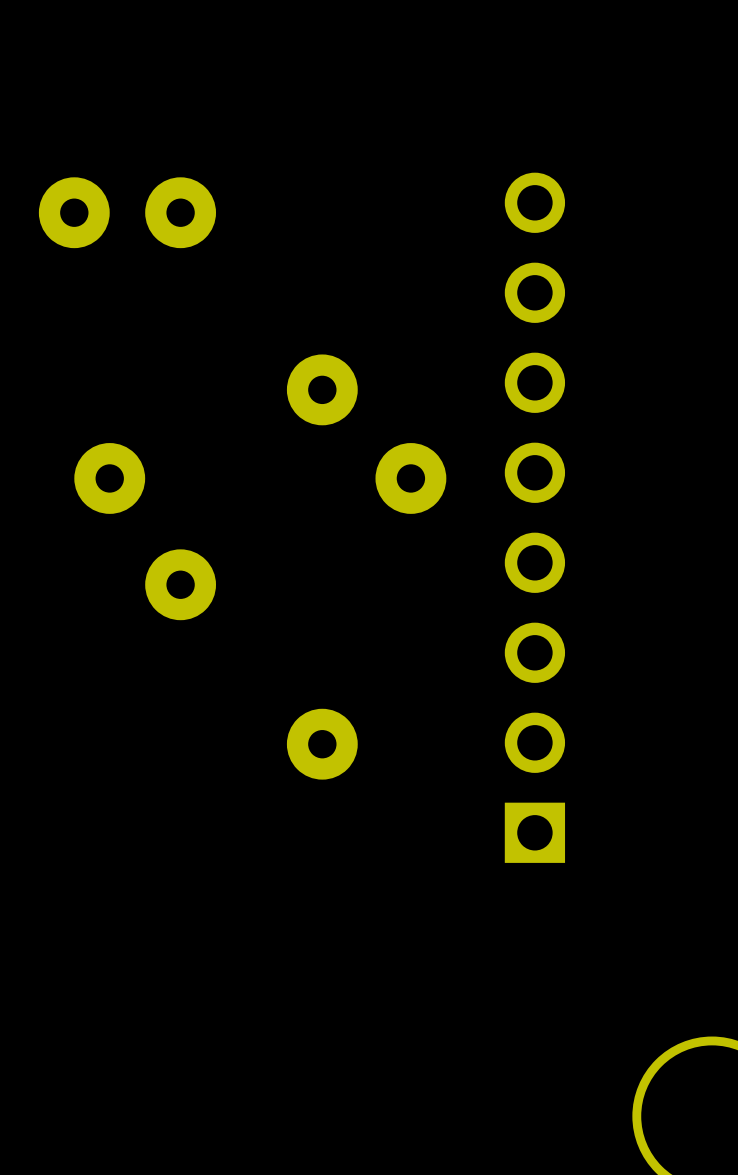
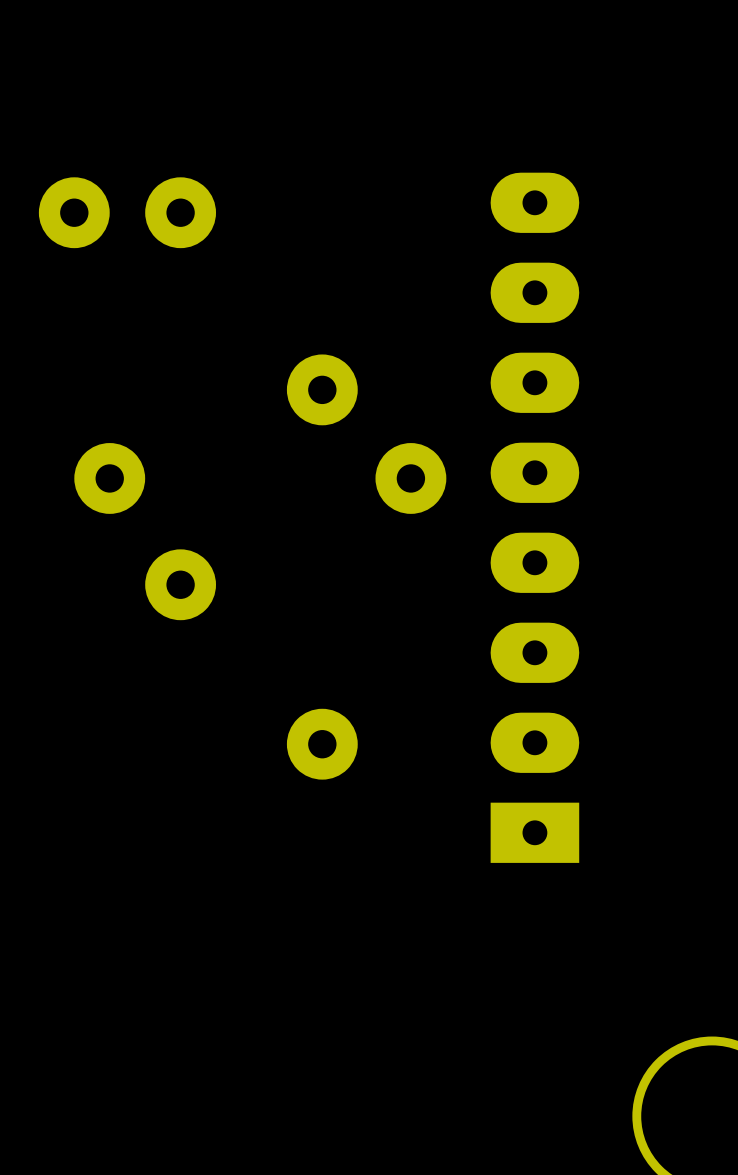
part footprint: [504, 172, 566, 863] -> [490, 172, 580, 863]

